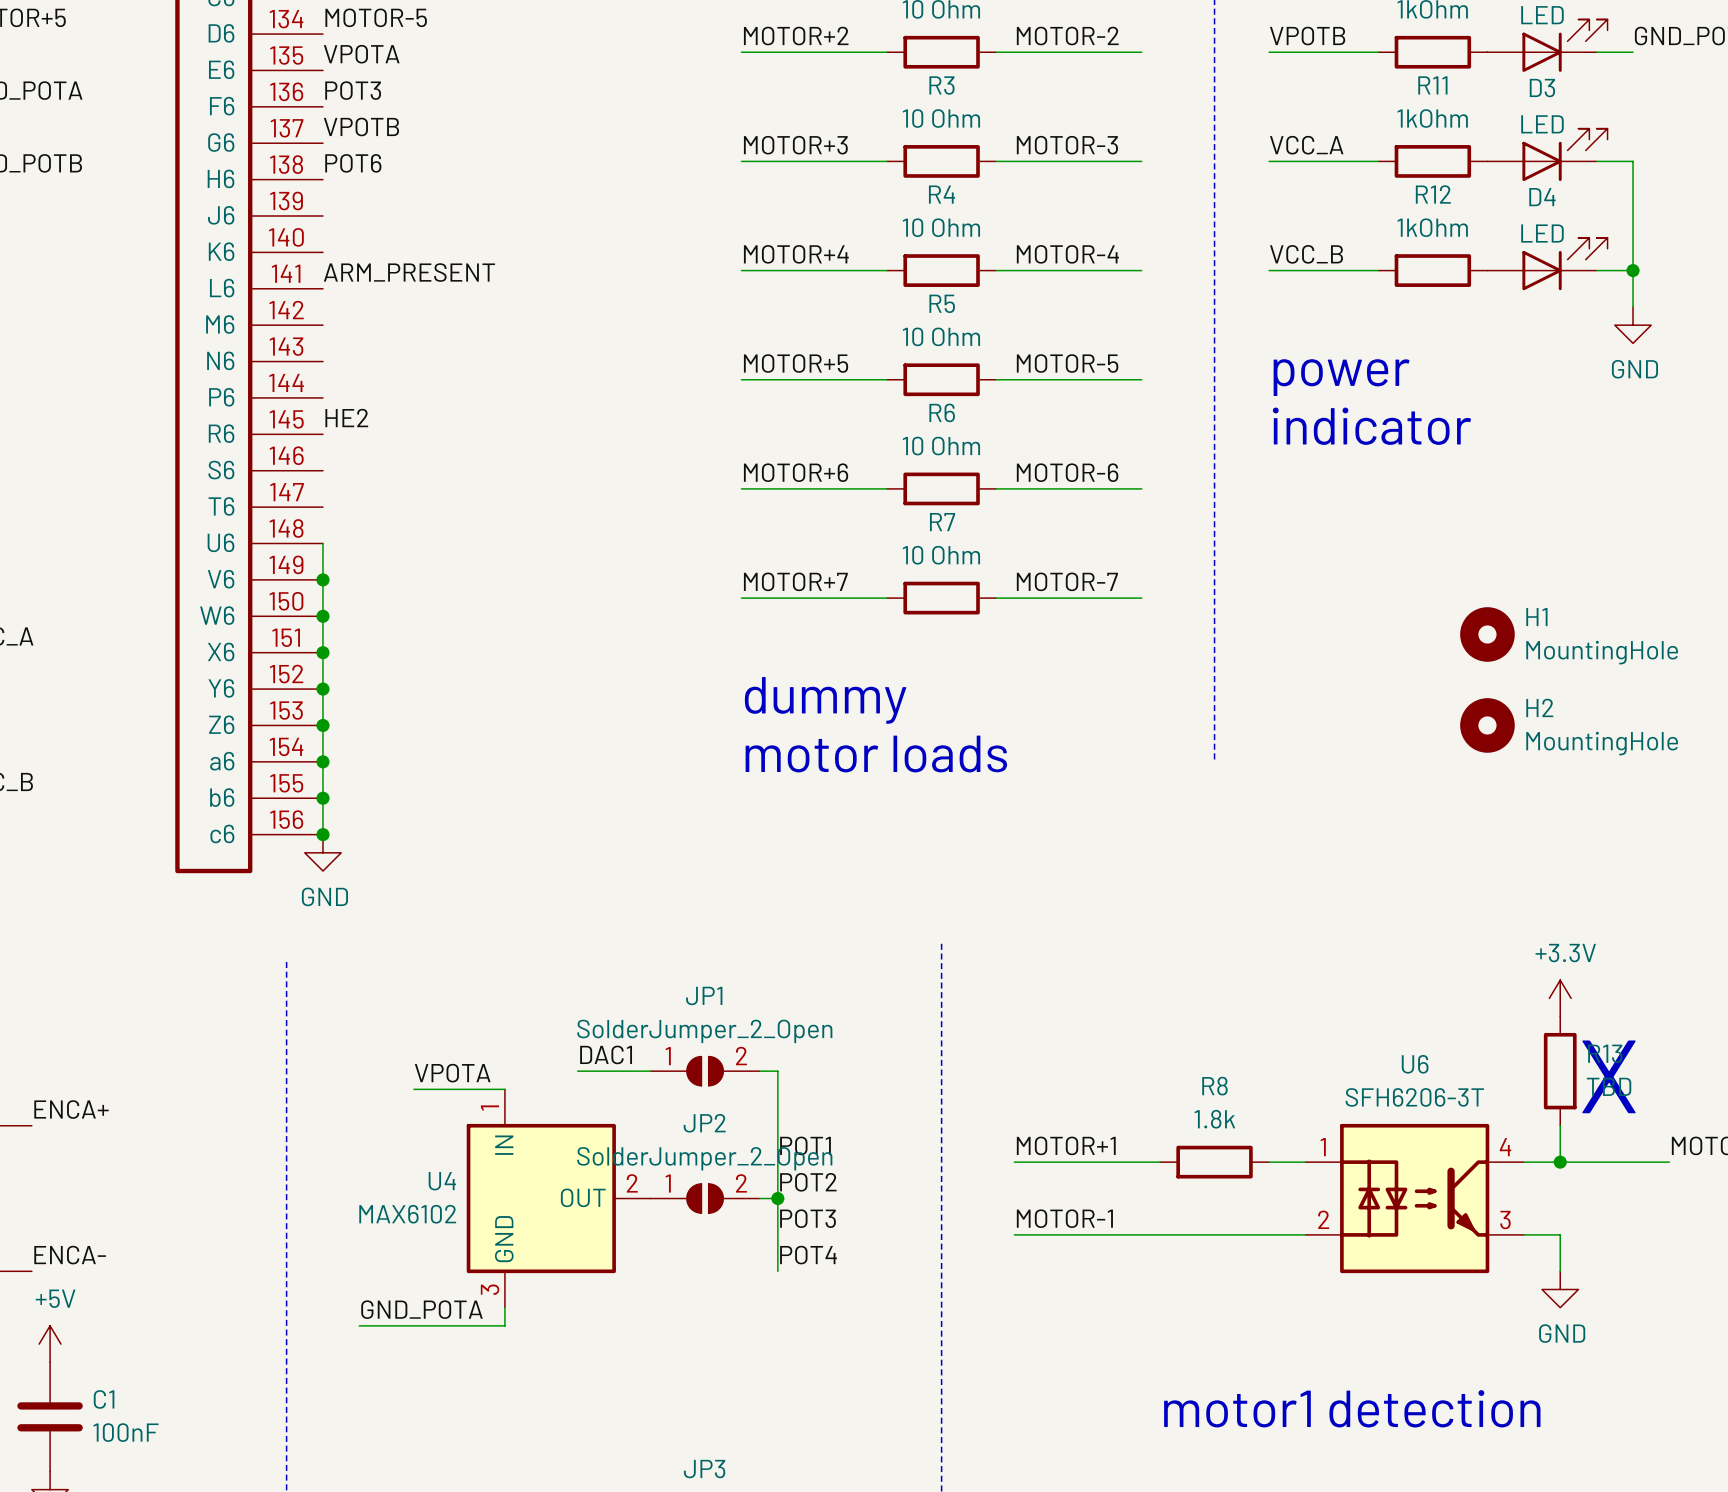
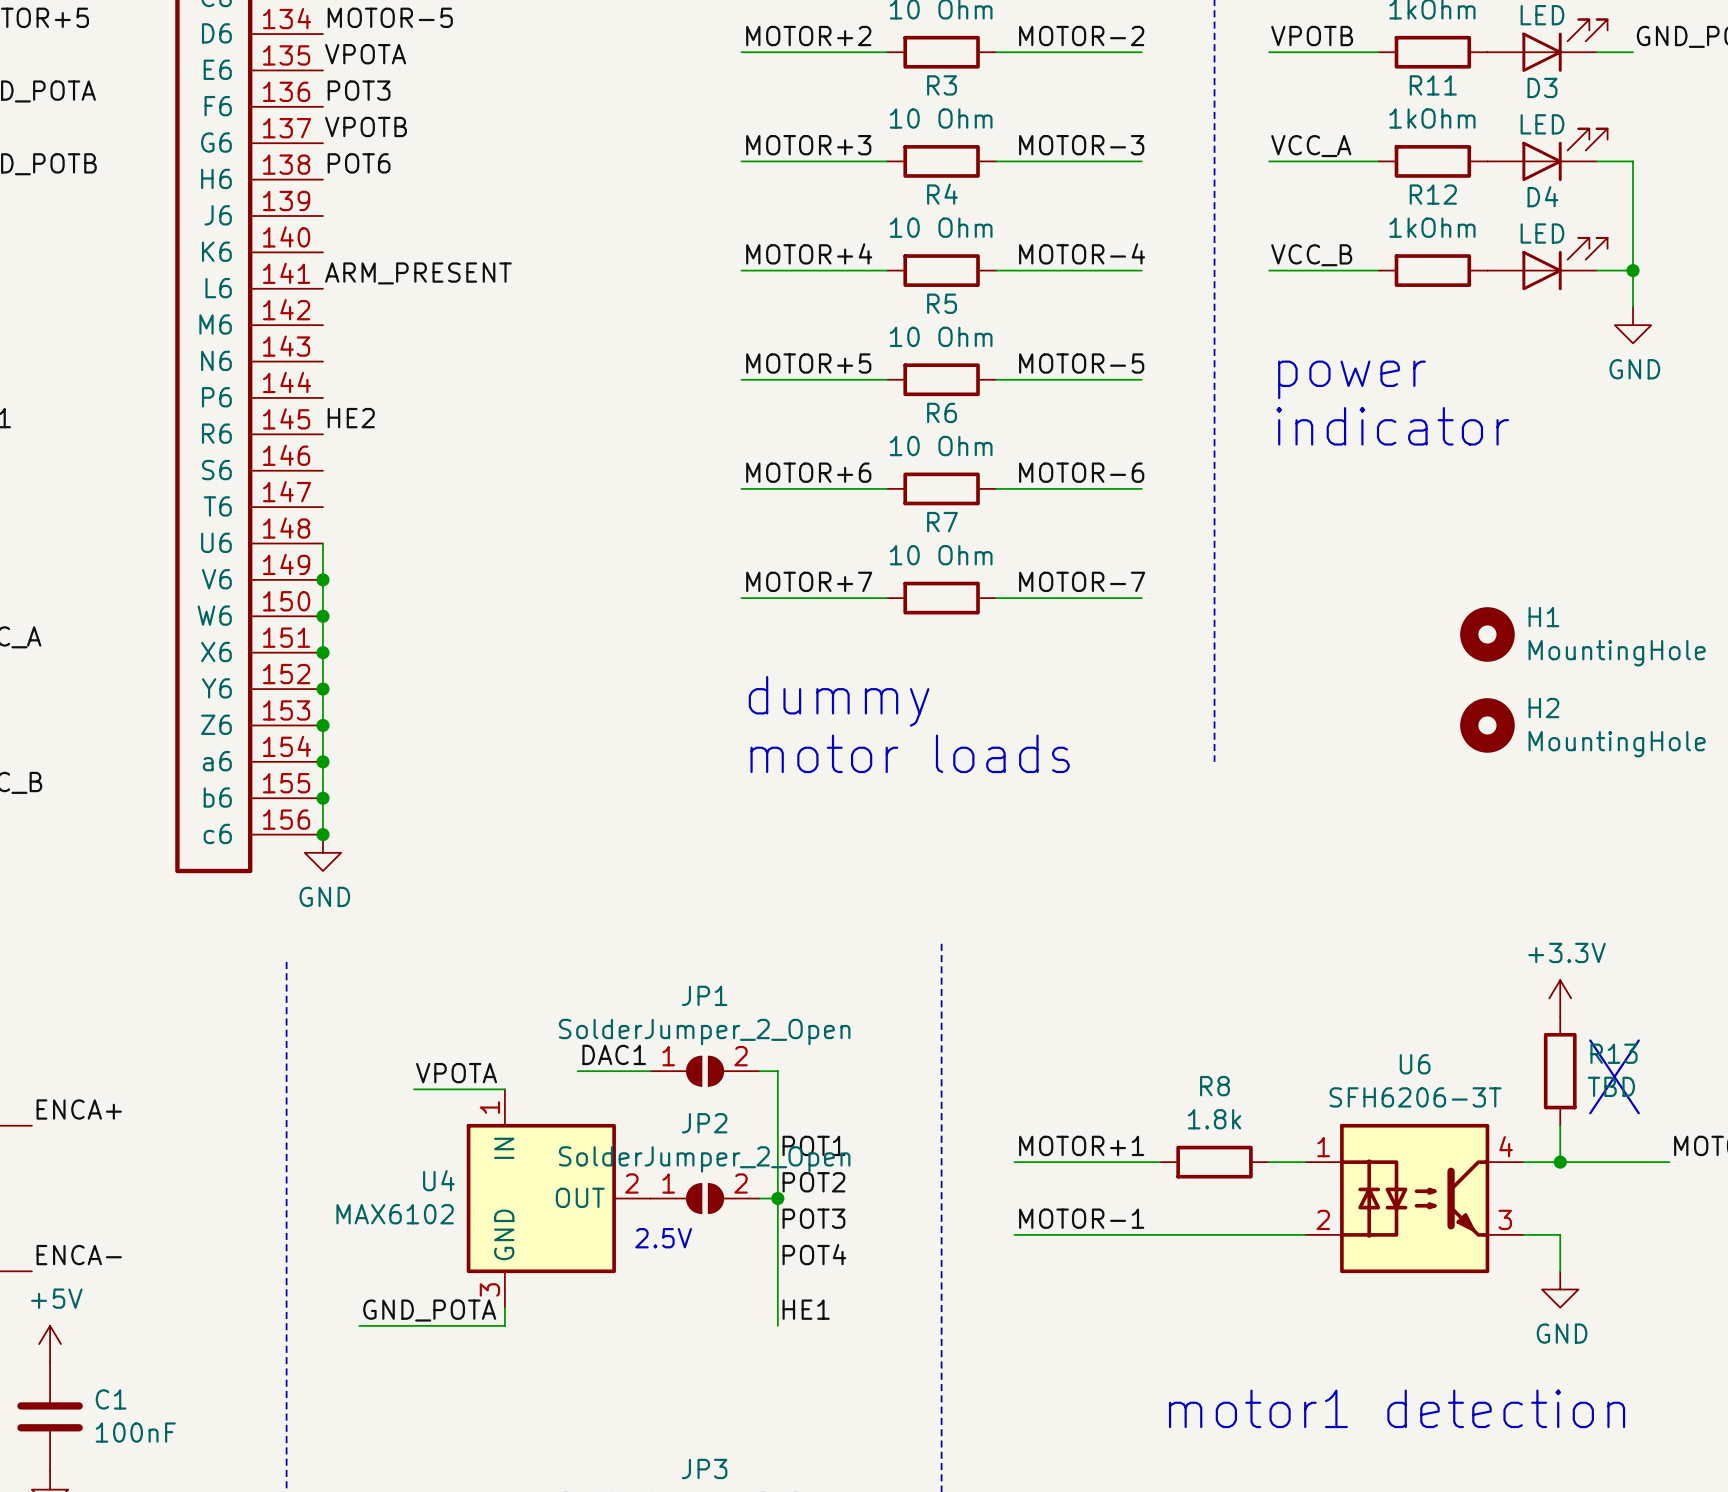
text: none -> 2.5V (663, 1238)
wire: none -> (777, 1271) (777, 1325)
label: none -> HE1 (806, 1309)

